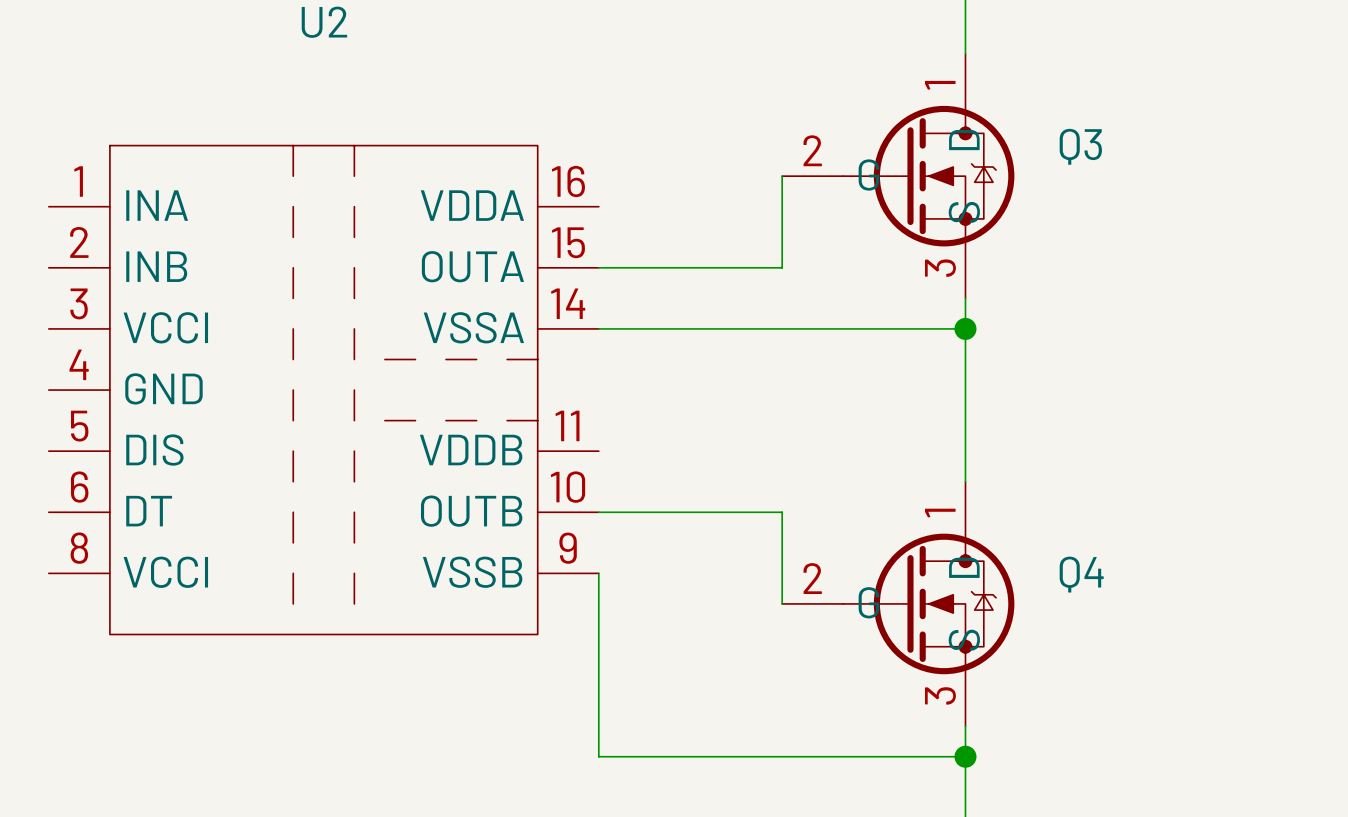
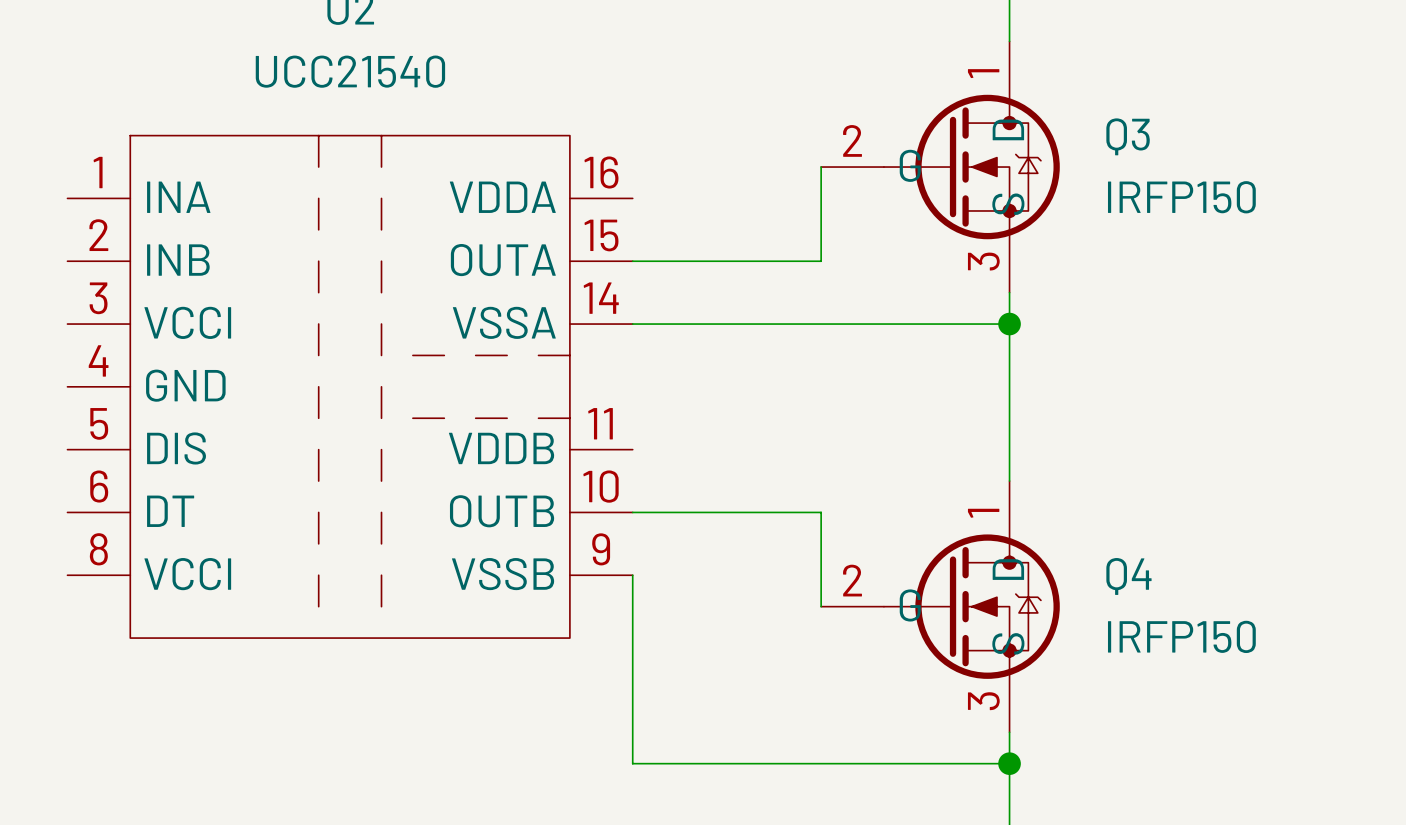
U2 value: none -> UCC21540 (350, 71)
Q3 value: none -> IRFP150 (1181, 197)
Q4 value: none -> IRFP150 (1181, 636)

